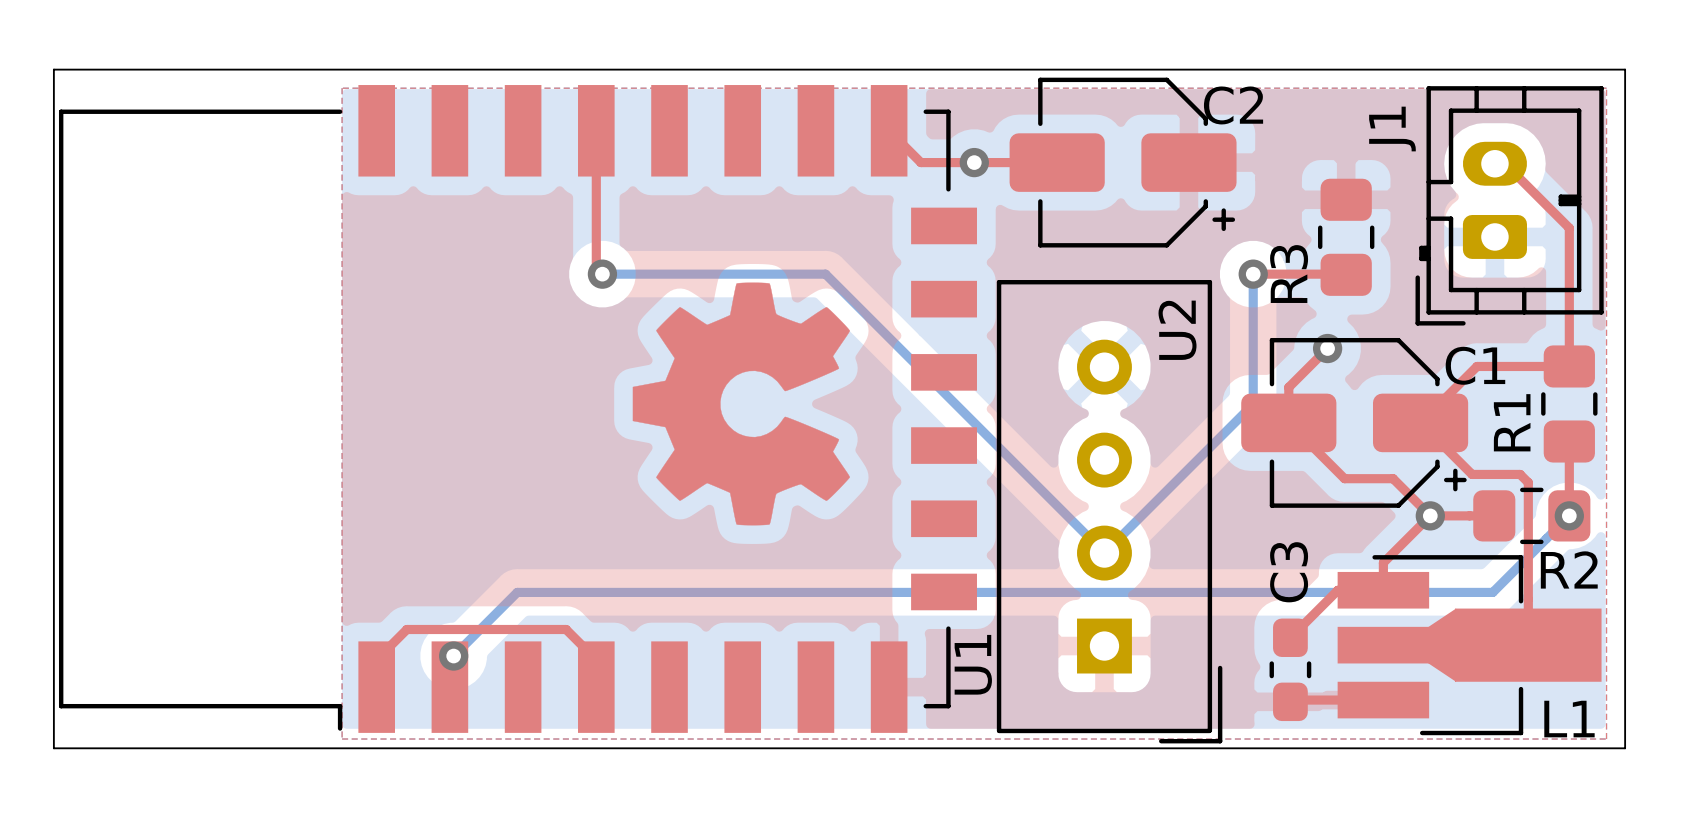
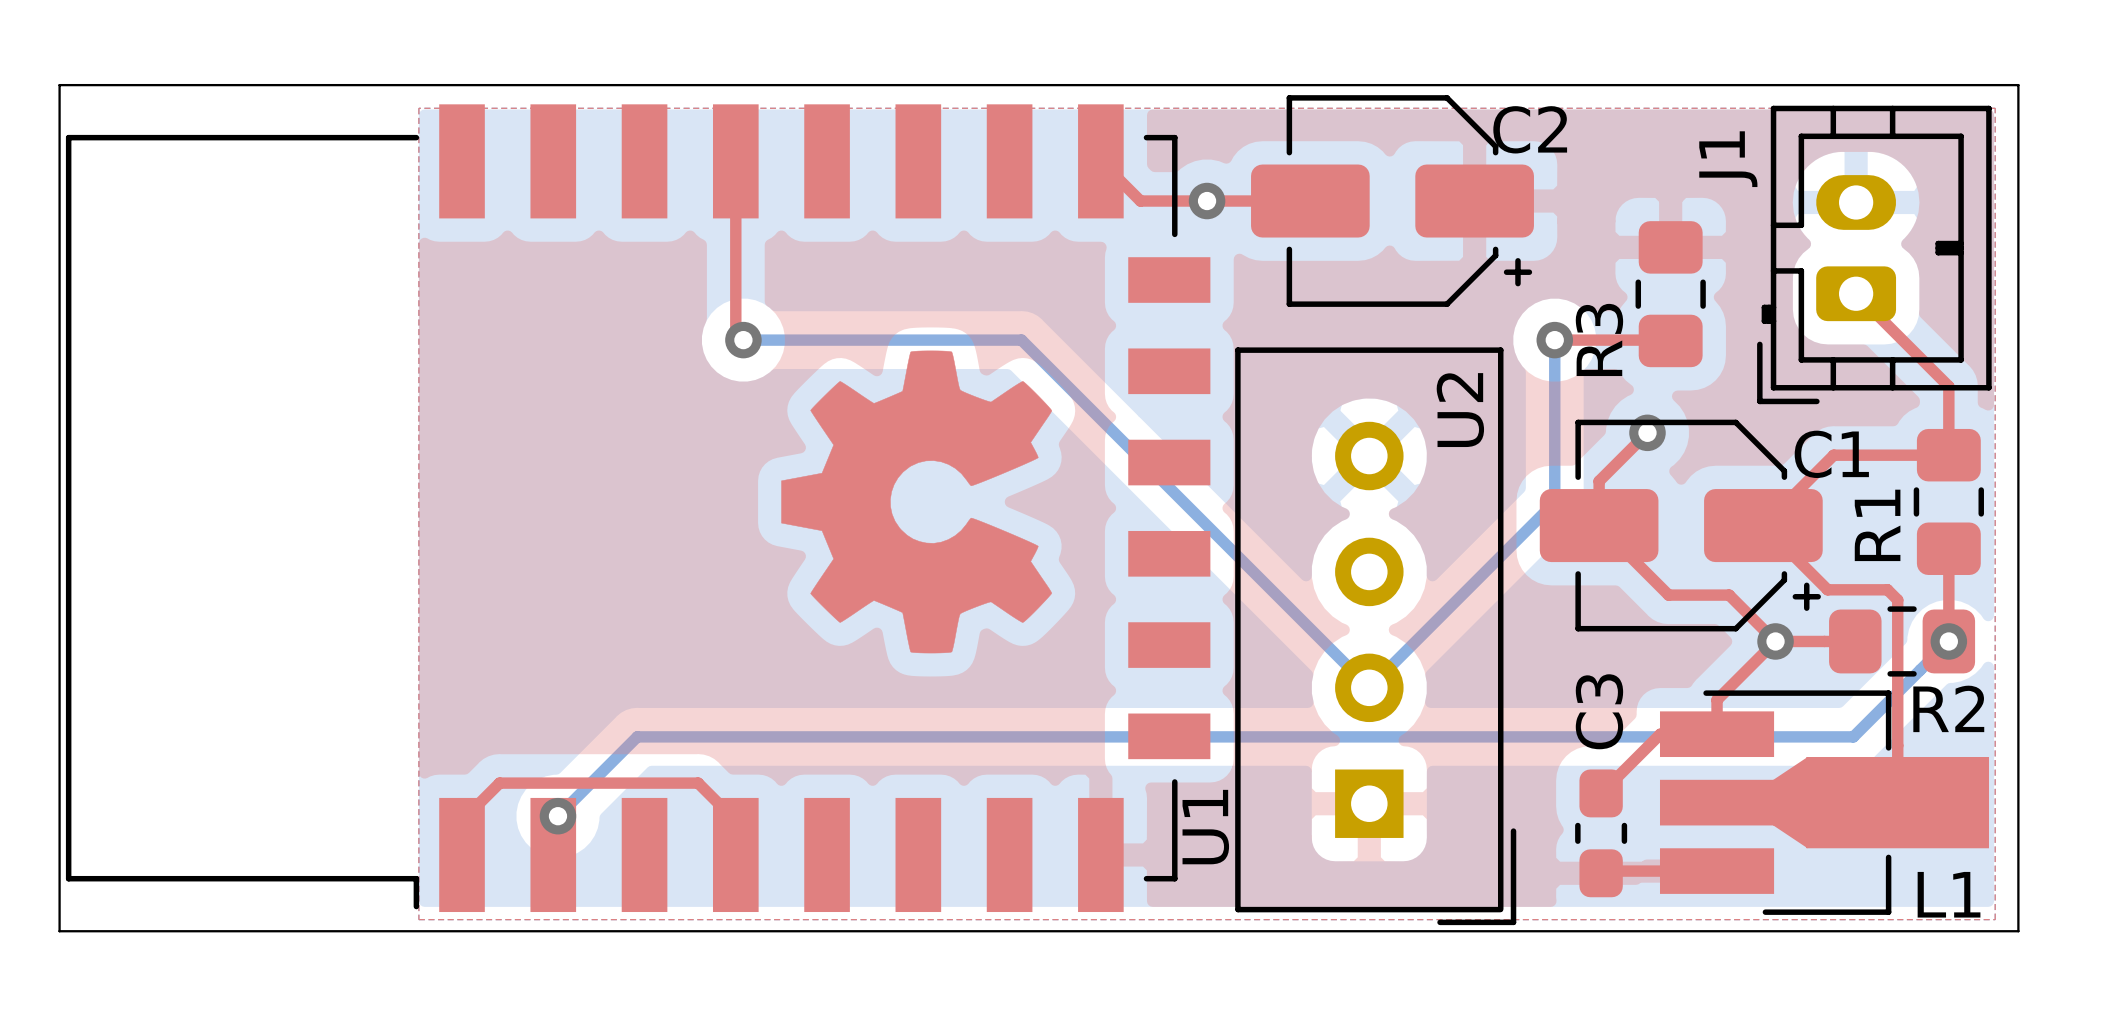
top track: (1494, 163) (1505, 163) (1569, 228) (1569, 311) -> (1856, 293) (1948, 386)

